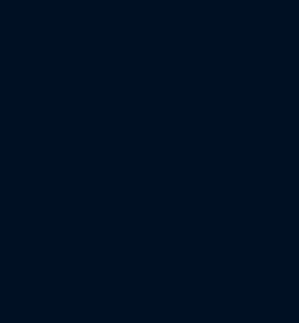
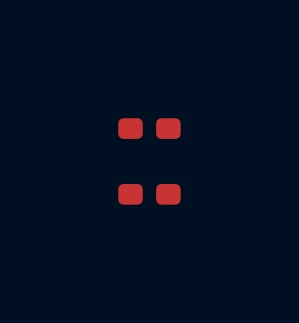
part: none -> (149, 128)
part: none -> (149, 194)

